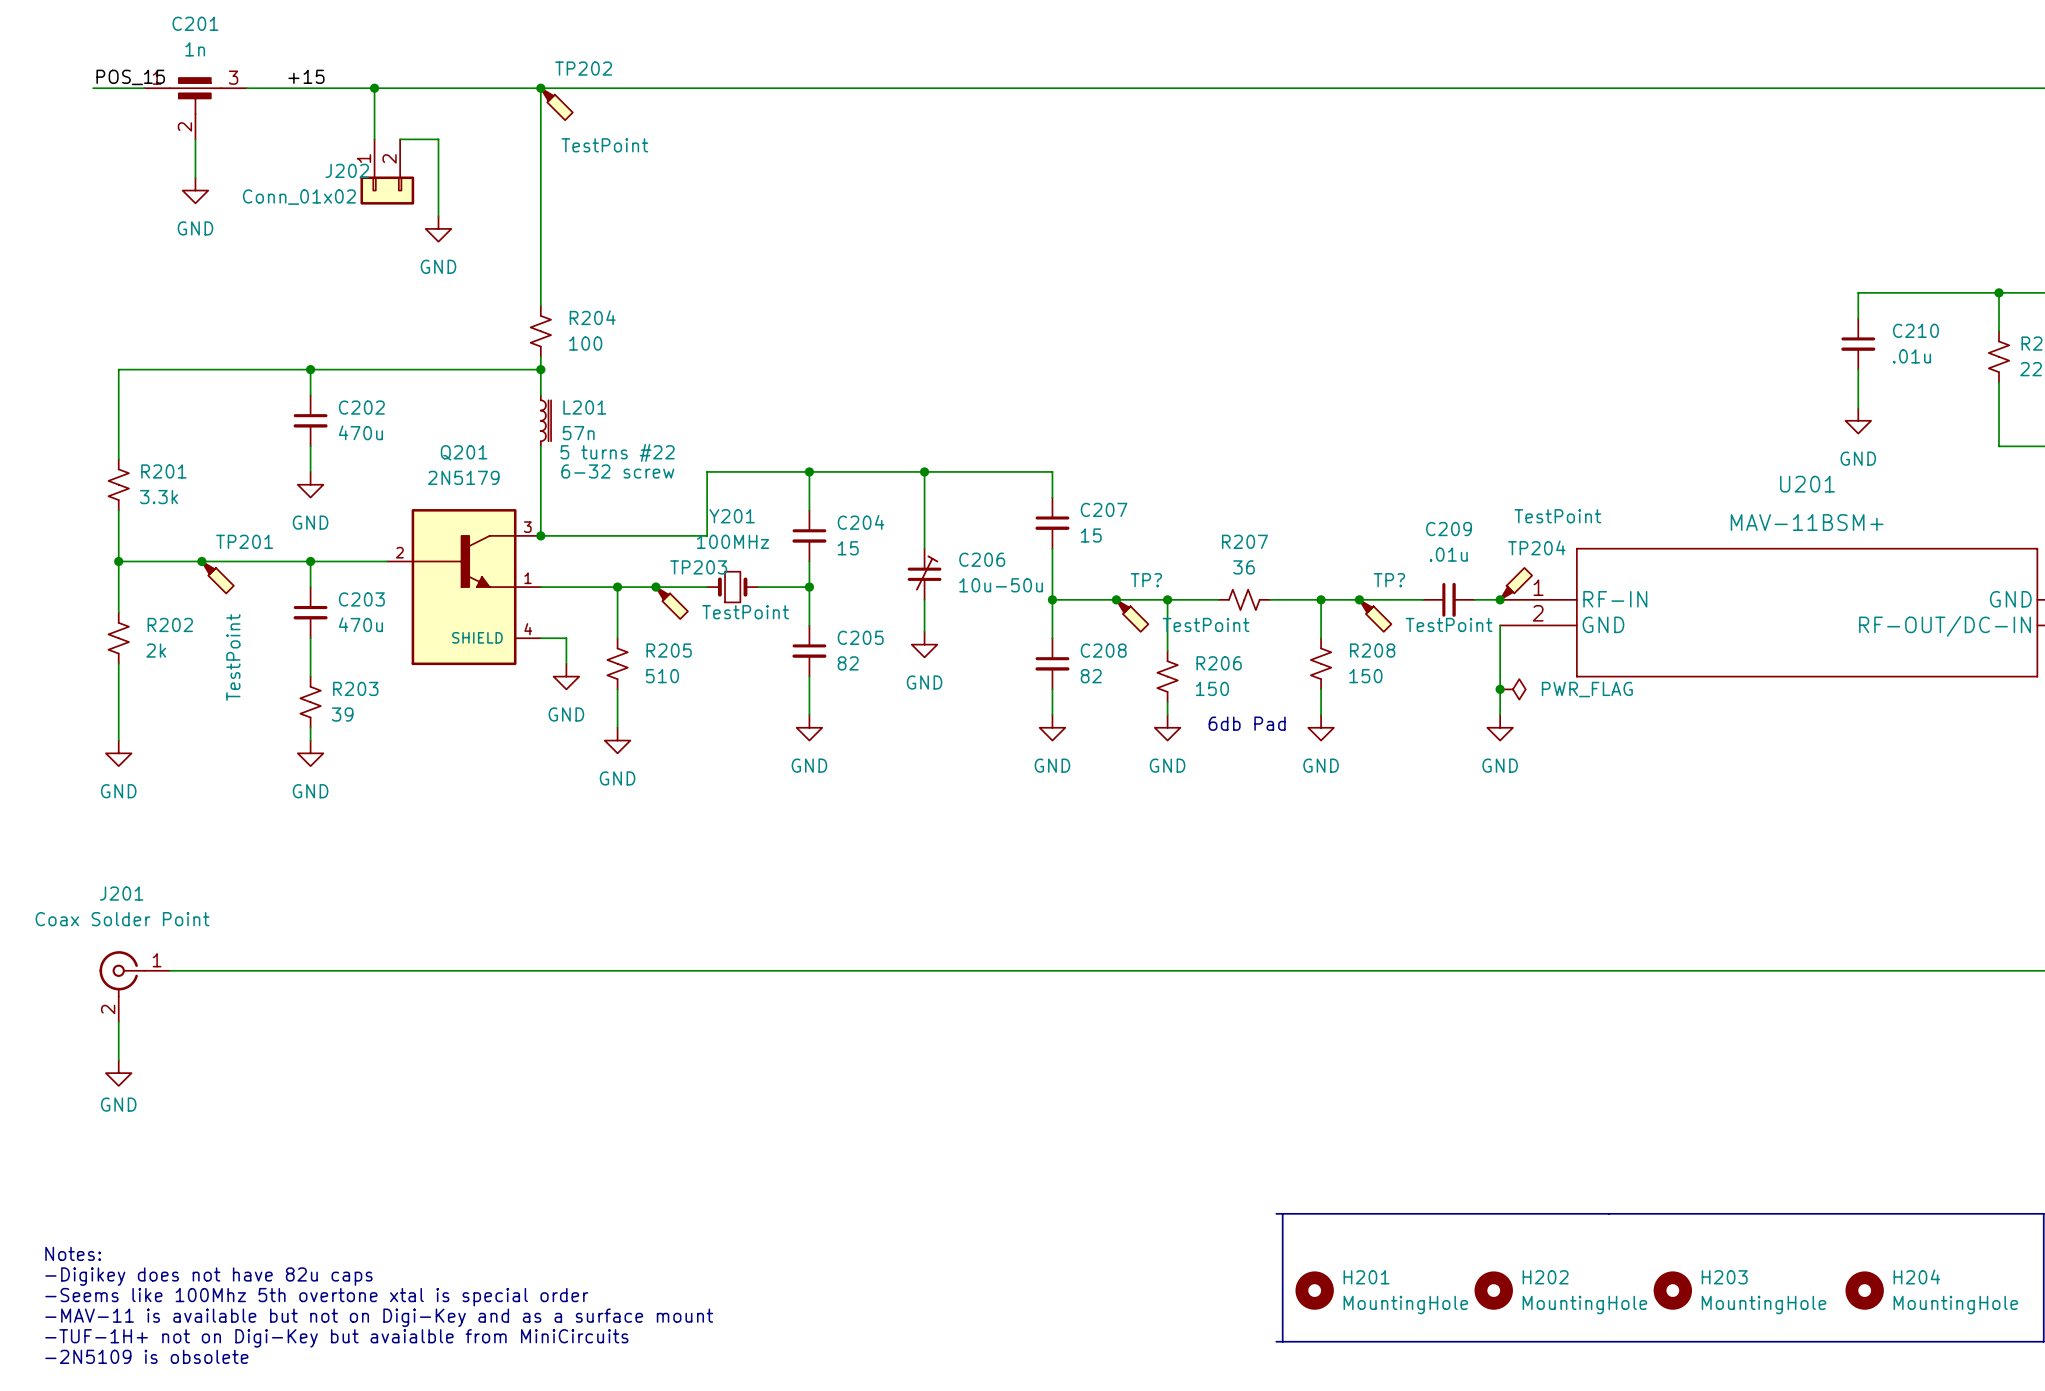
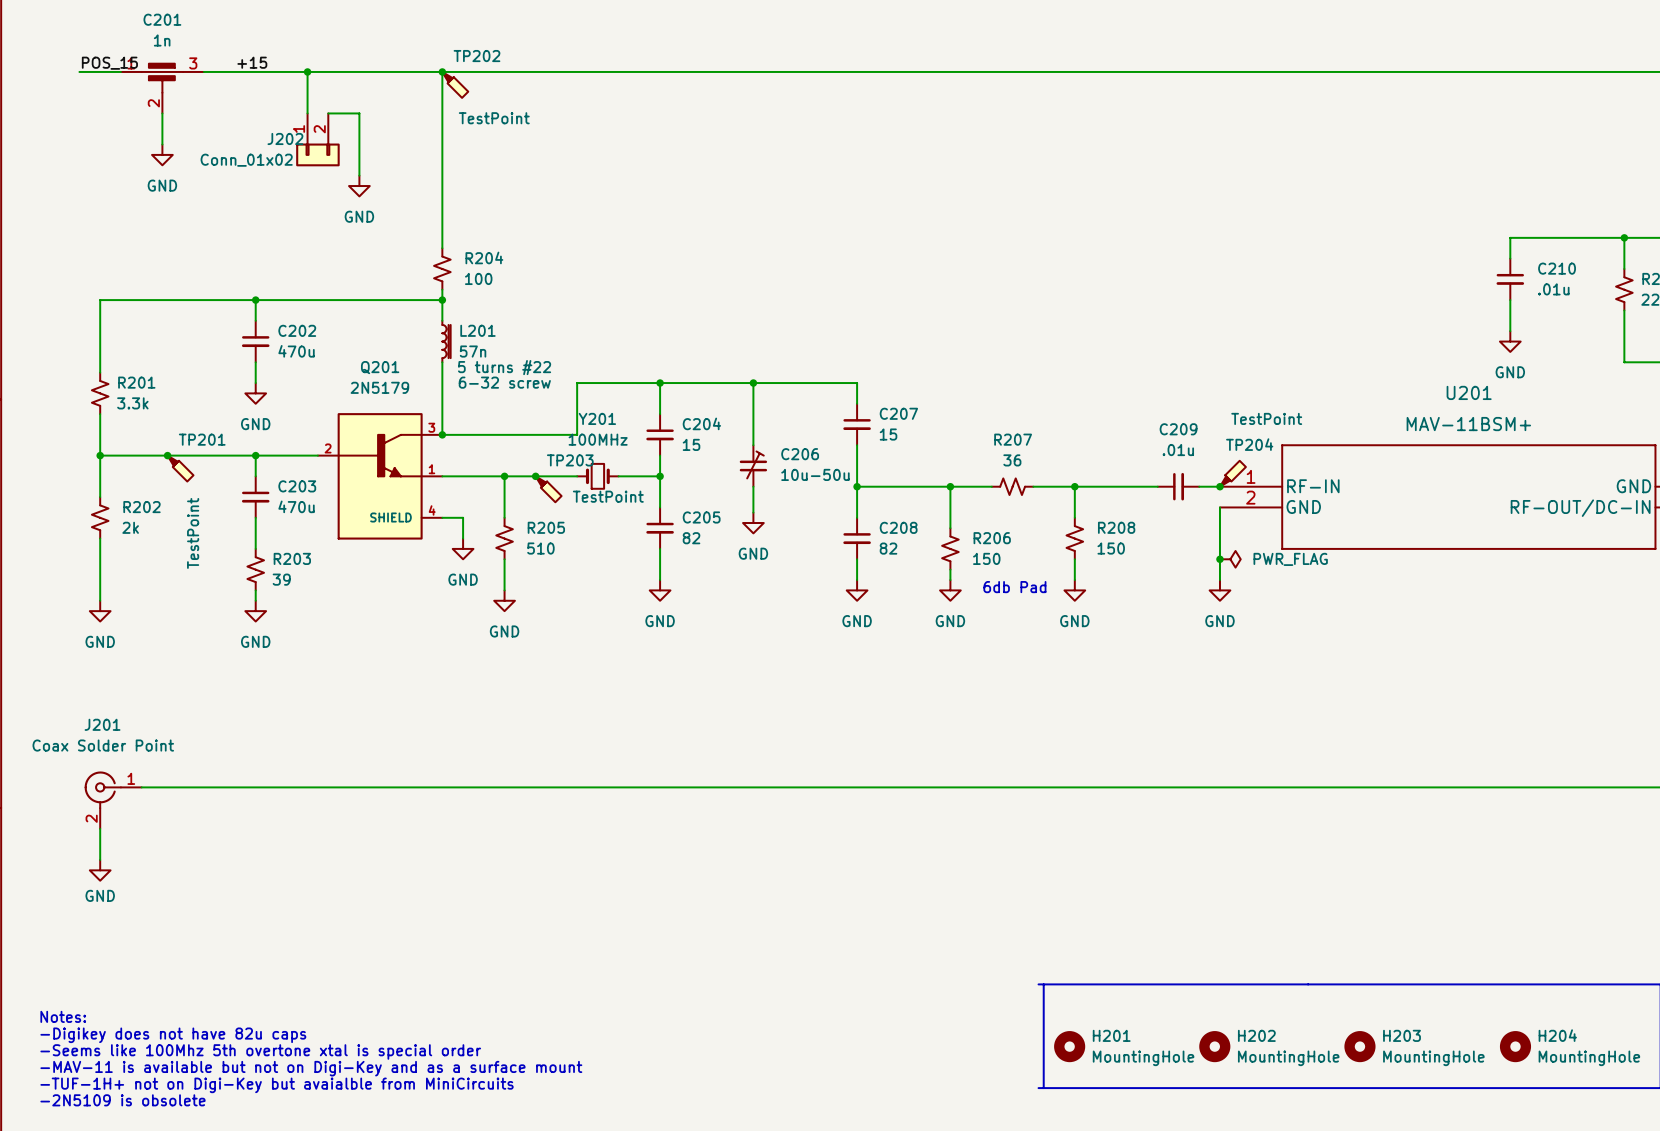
junction: (1116, 599) -> none
junction: (1359, 599) -> none
TP?: TestPoint (1132, 615) -> none
TP?: TestPoint (1375, 615) -> none

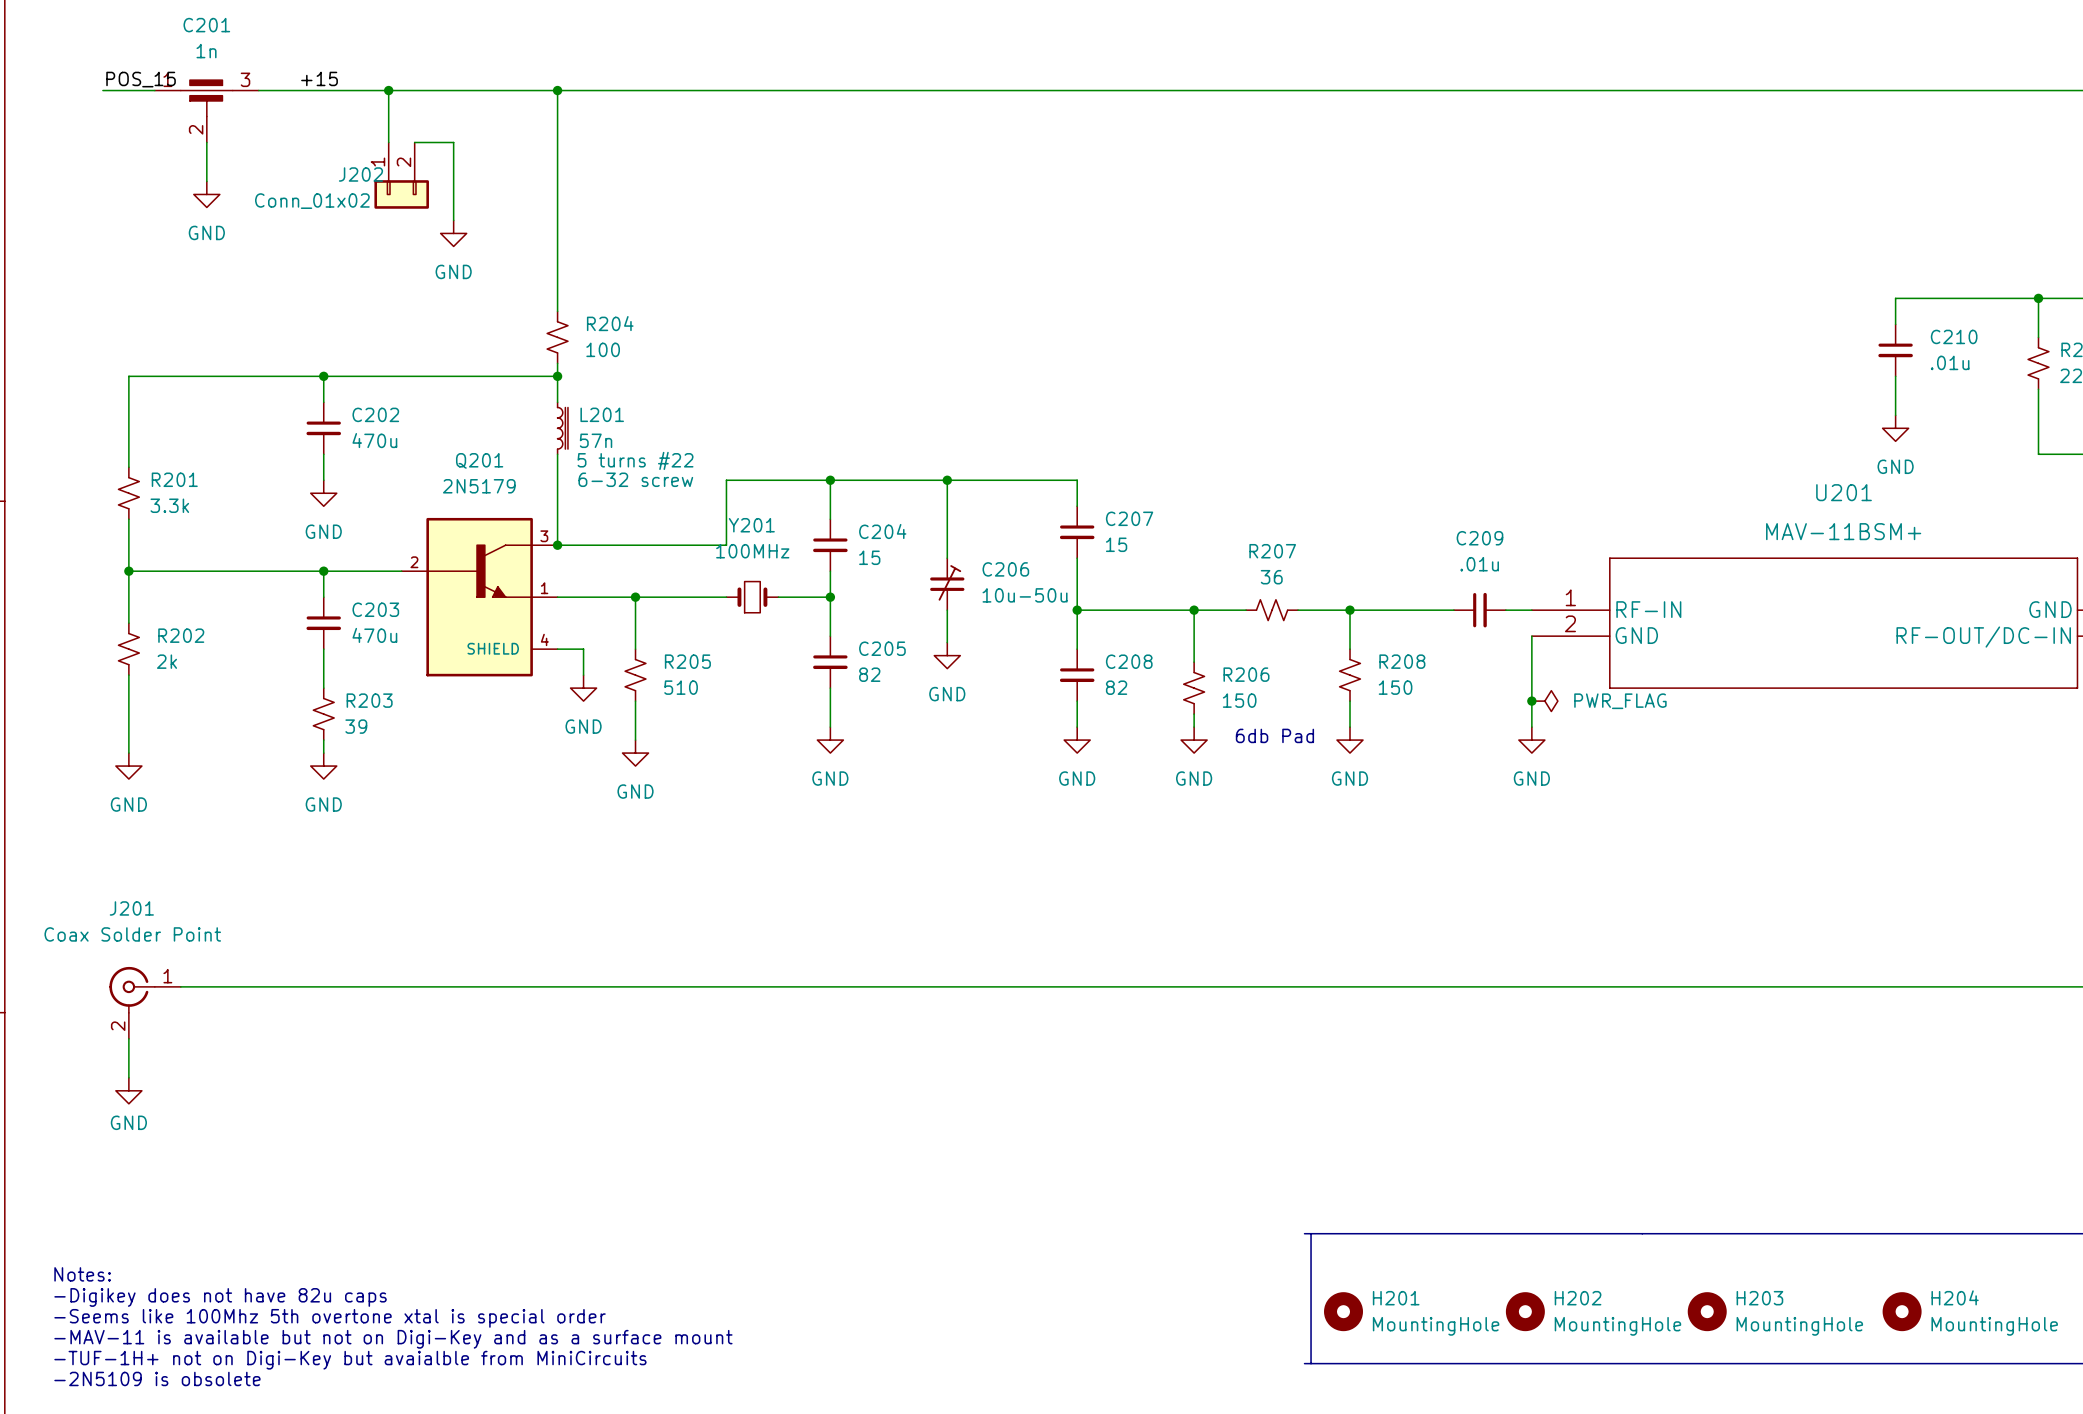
TP202: TestPoint (455, 84) -> none
junction: (167, 455) -> none
TP201: TestPoint (180, 468) -> none
TP204: TestPoint (1232, 473) -> none
junction: (535, 476) -> none
junction: (1219, 486) -> none
TP203: TestPoint (548, 489) -> none

